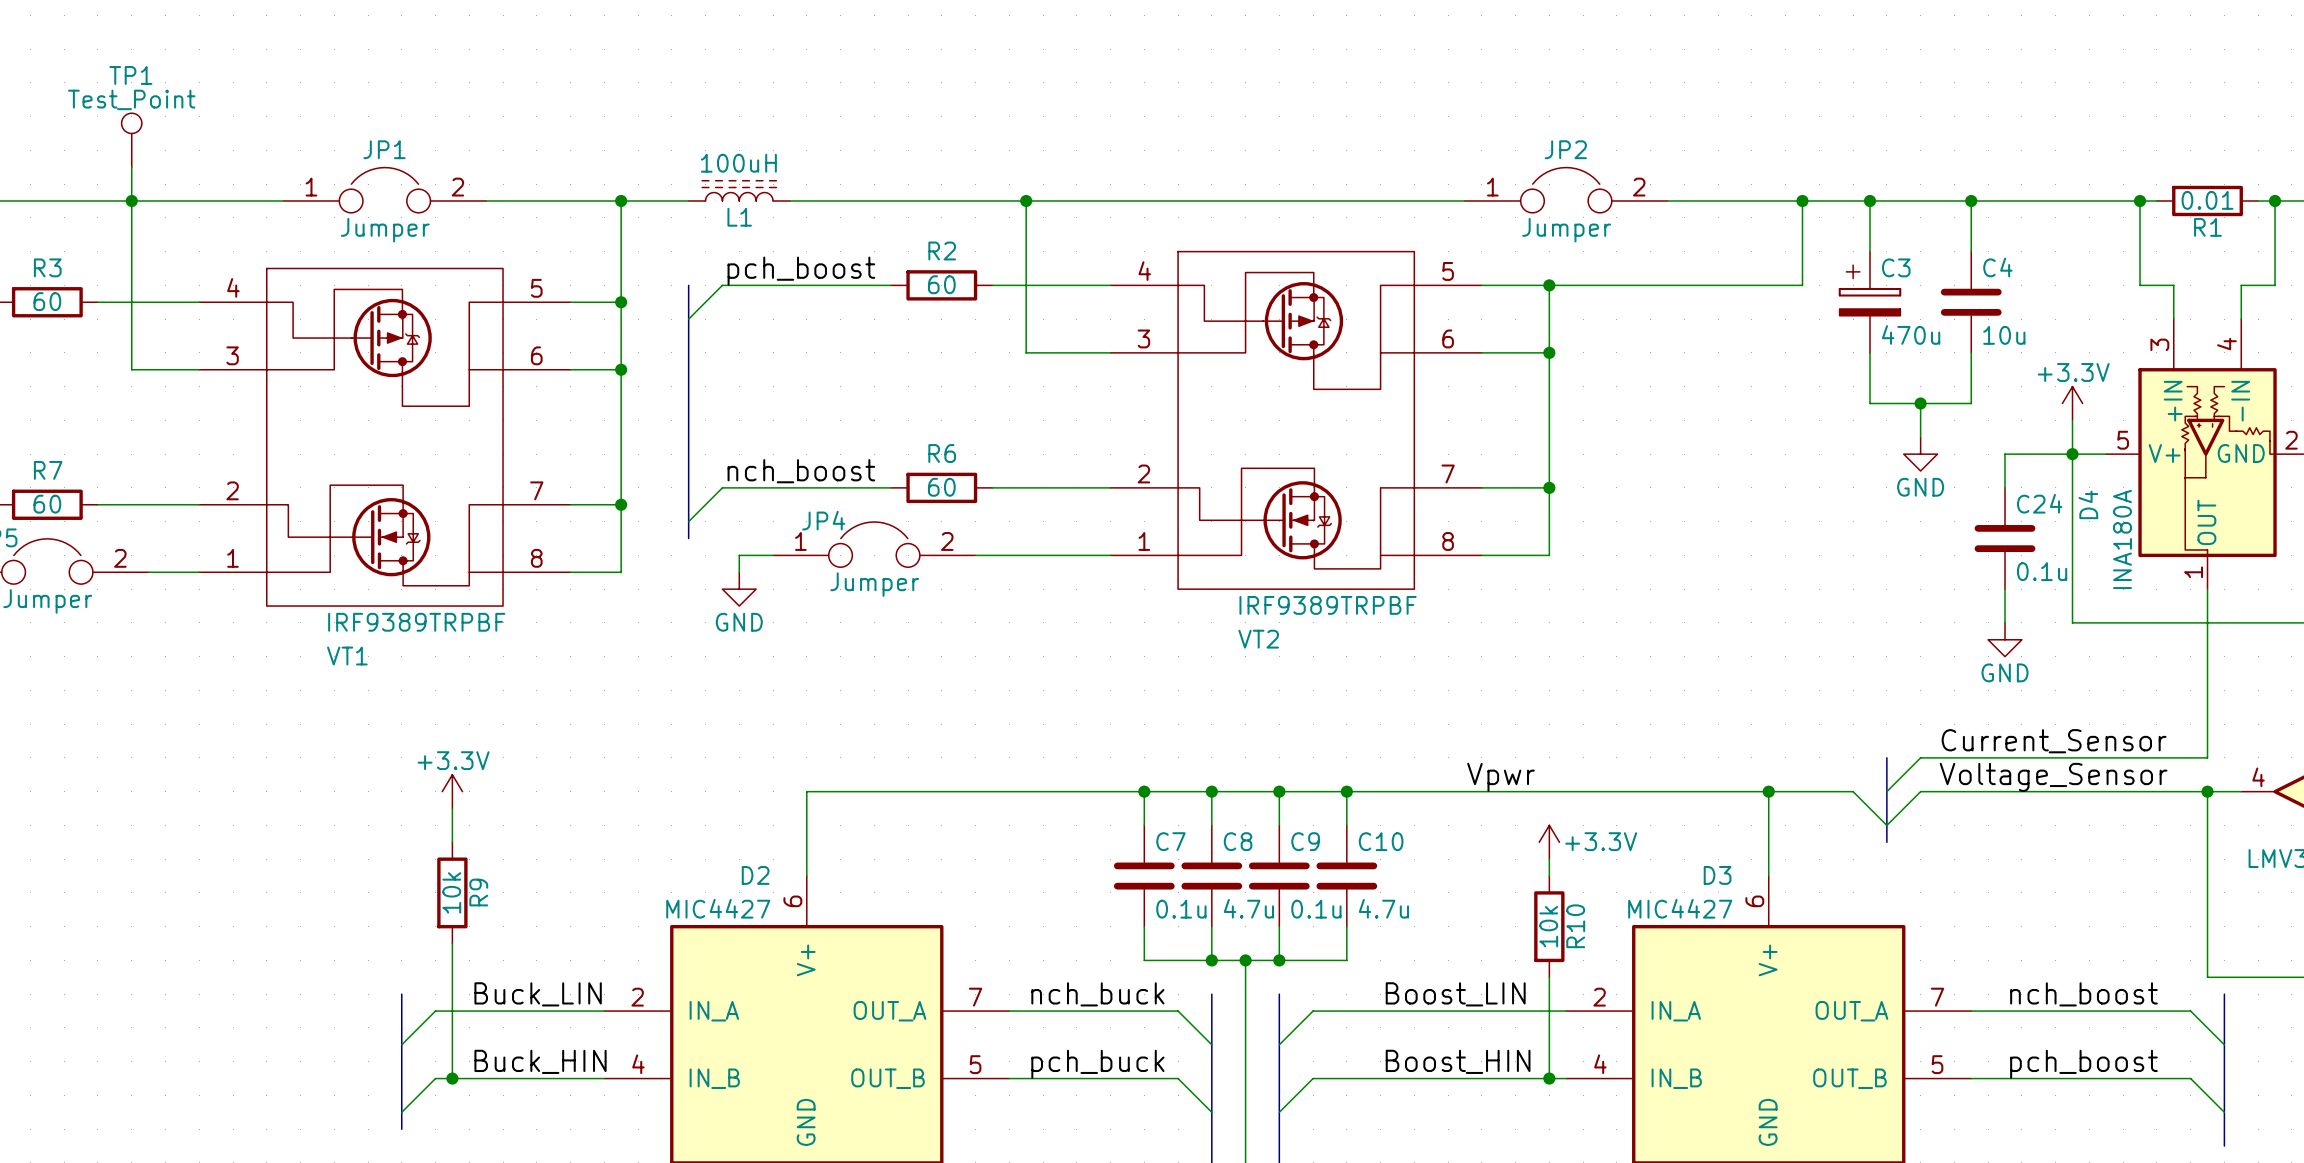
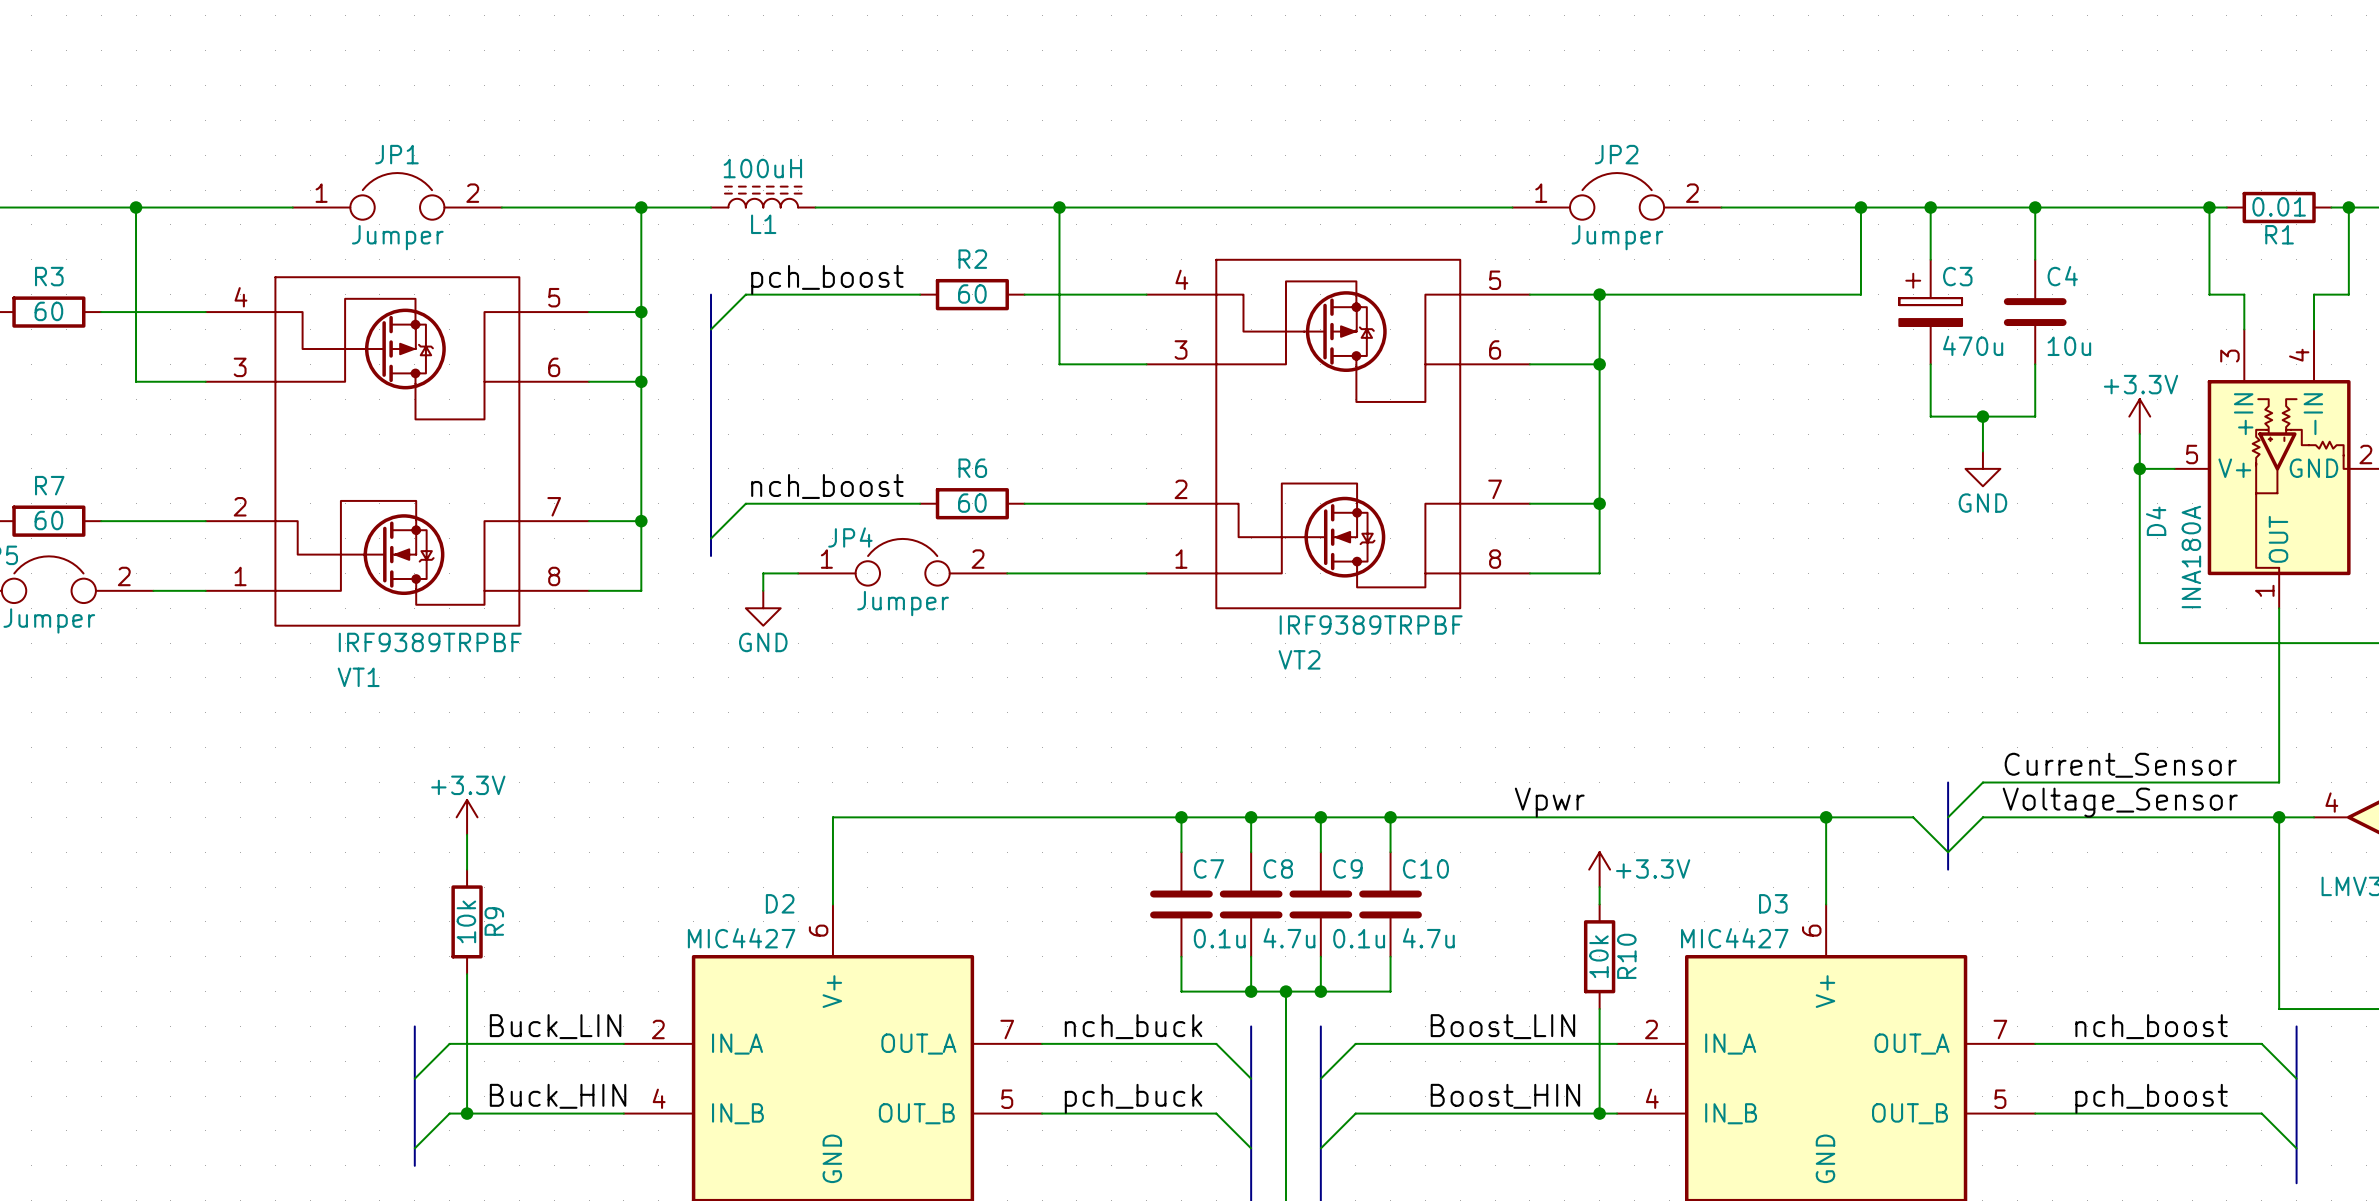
TP1: Test_Point (131, 140) -> none
wire: (131, 167) (131, 200) -> none
wire: (2072, 454) (2005, 454) (2005, 487) -> none
C24: 0.1u (2005, 538) -> none
wire: (2005, 589) (2005, 622) -> none
power symbol: GND (2005, 639) -> none

